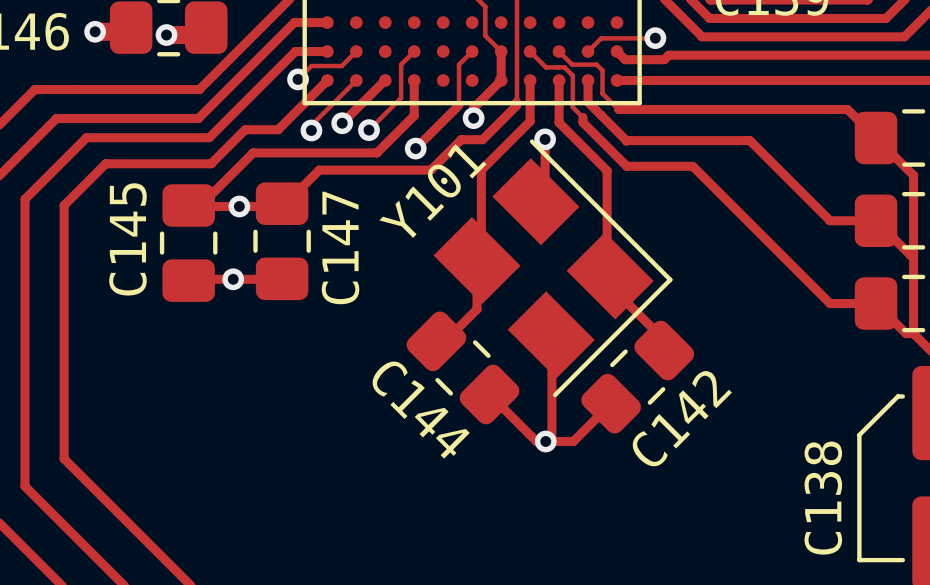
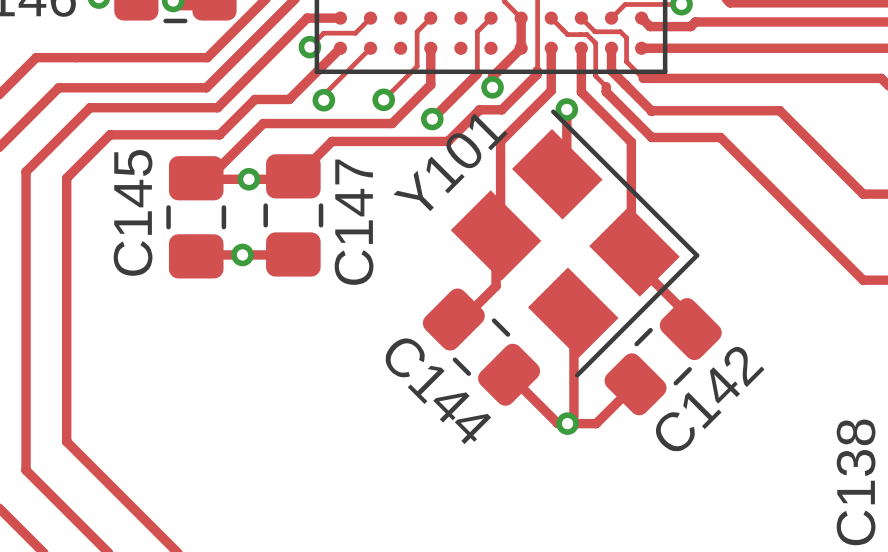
top track: (384, 80) (342, 123) -> none
via: (342, 123) -> none

